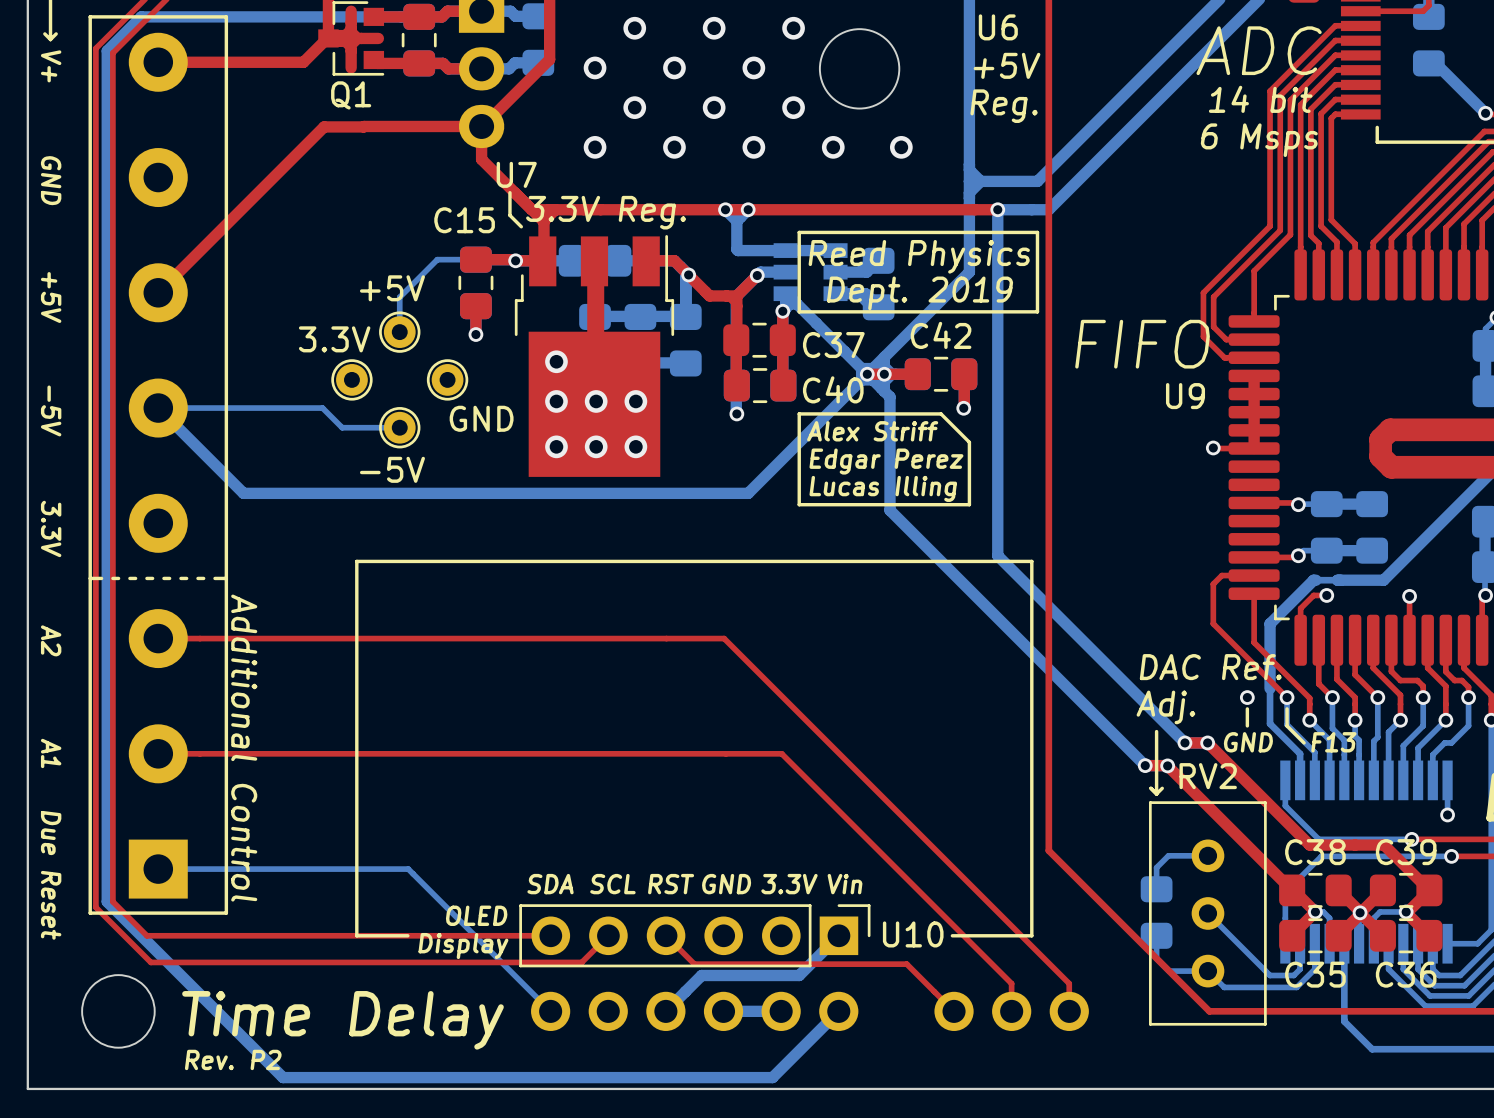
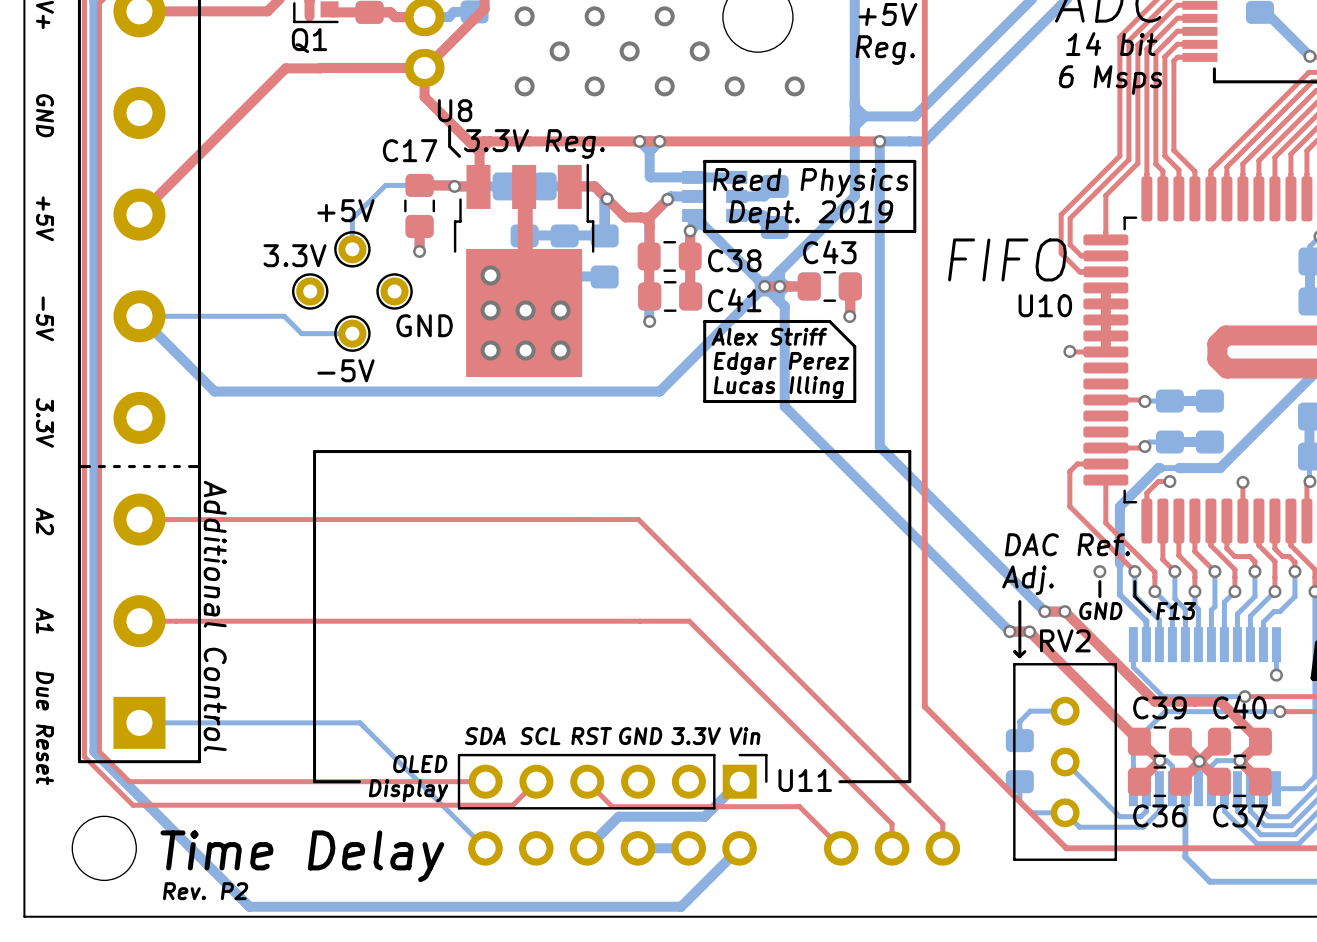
U7 name: U7 (516, 174) -> U8 (455, 110)
C15 name: C15 (464, 220) -> C17 (410, 150)
C42 name: C42 (941, 335) -> C43 (829, 252)
C37 name: C37 (833, 345) -> C38 (734, 260)
C40 name: C40 (833, 389) -> C41 (734, 300)
U9 name: U9 (1185, 396) -> U10 (1045, 305)
C38 name: C38 (1315, 852) -> C39 (1159, 707)
C39 name: C39 (1406, 852) -> C40 (1239, 707)
U10 name: U10 (913, 934) -> U11 (805, 780)
C35 name: C35 (1315, 974) -> C36 (1159, 815)
C36 name: C36 (1406, 974) -> C37 (1240, 815)

